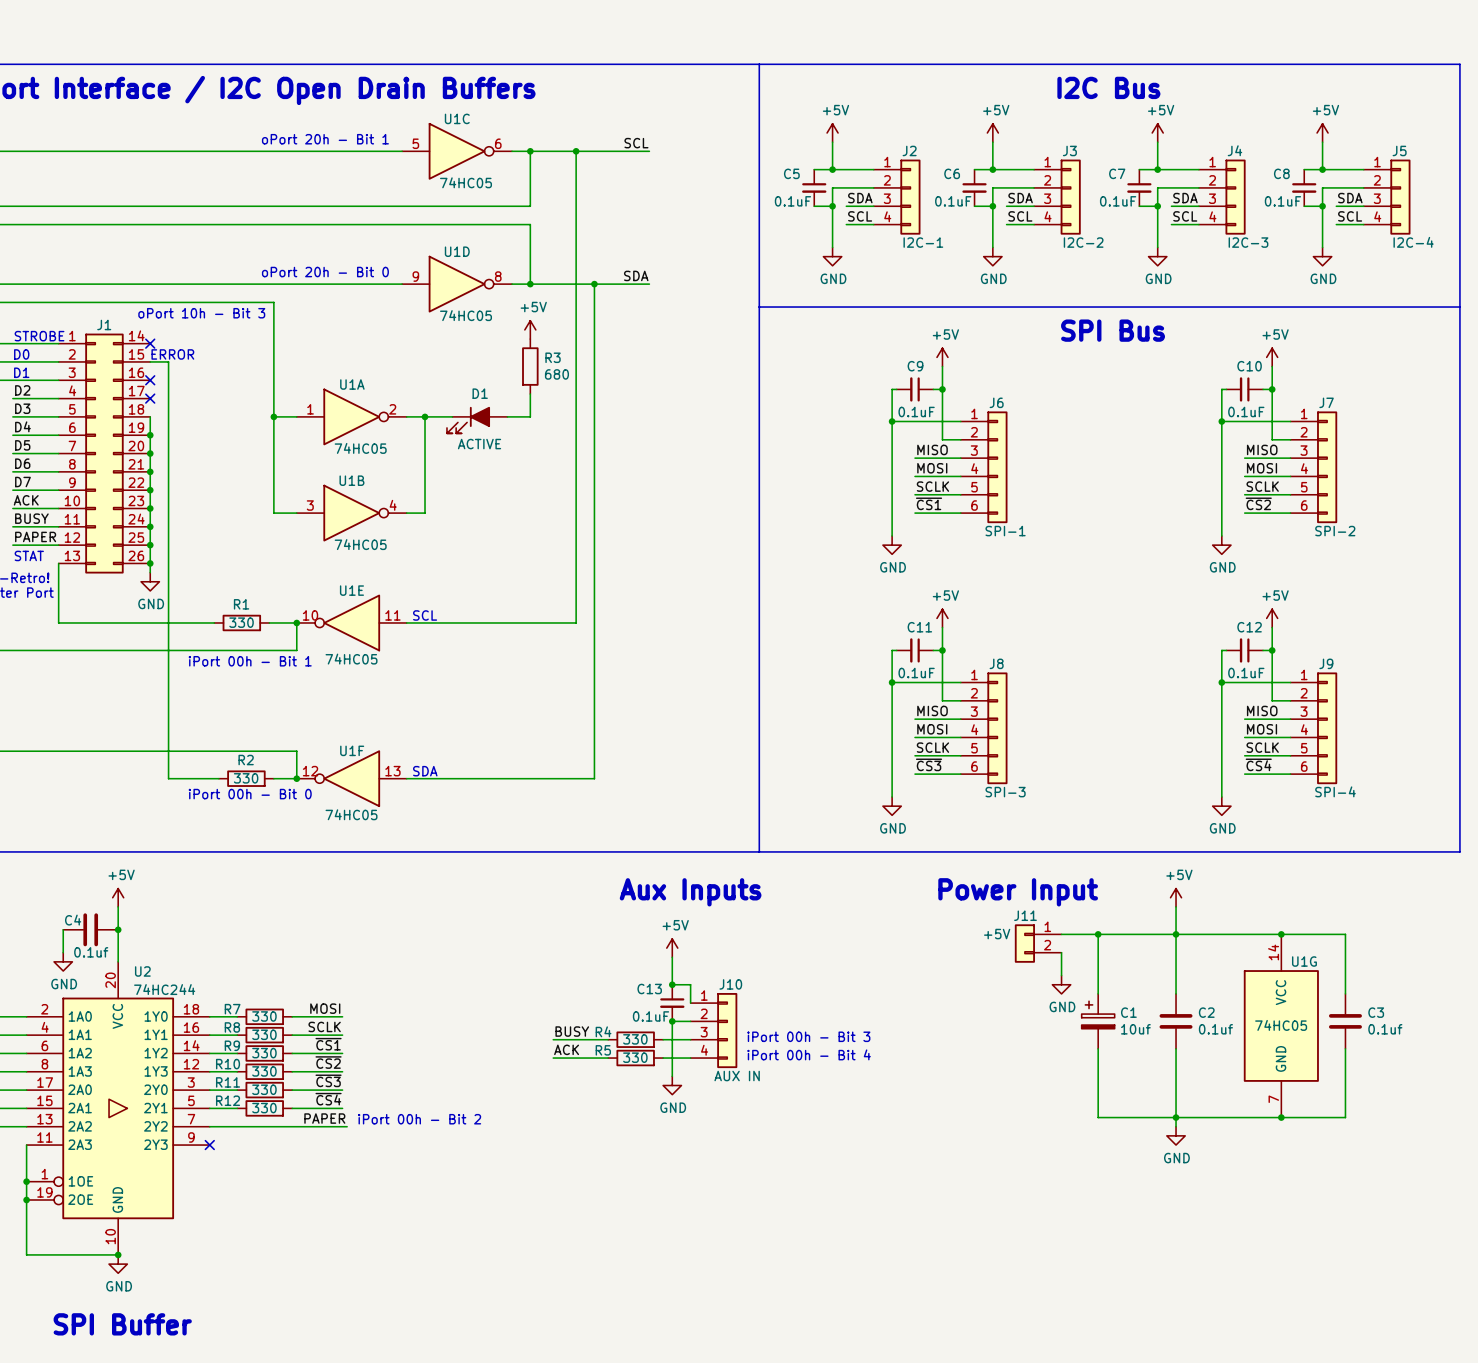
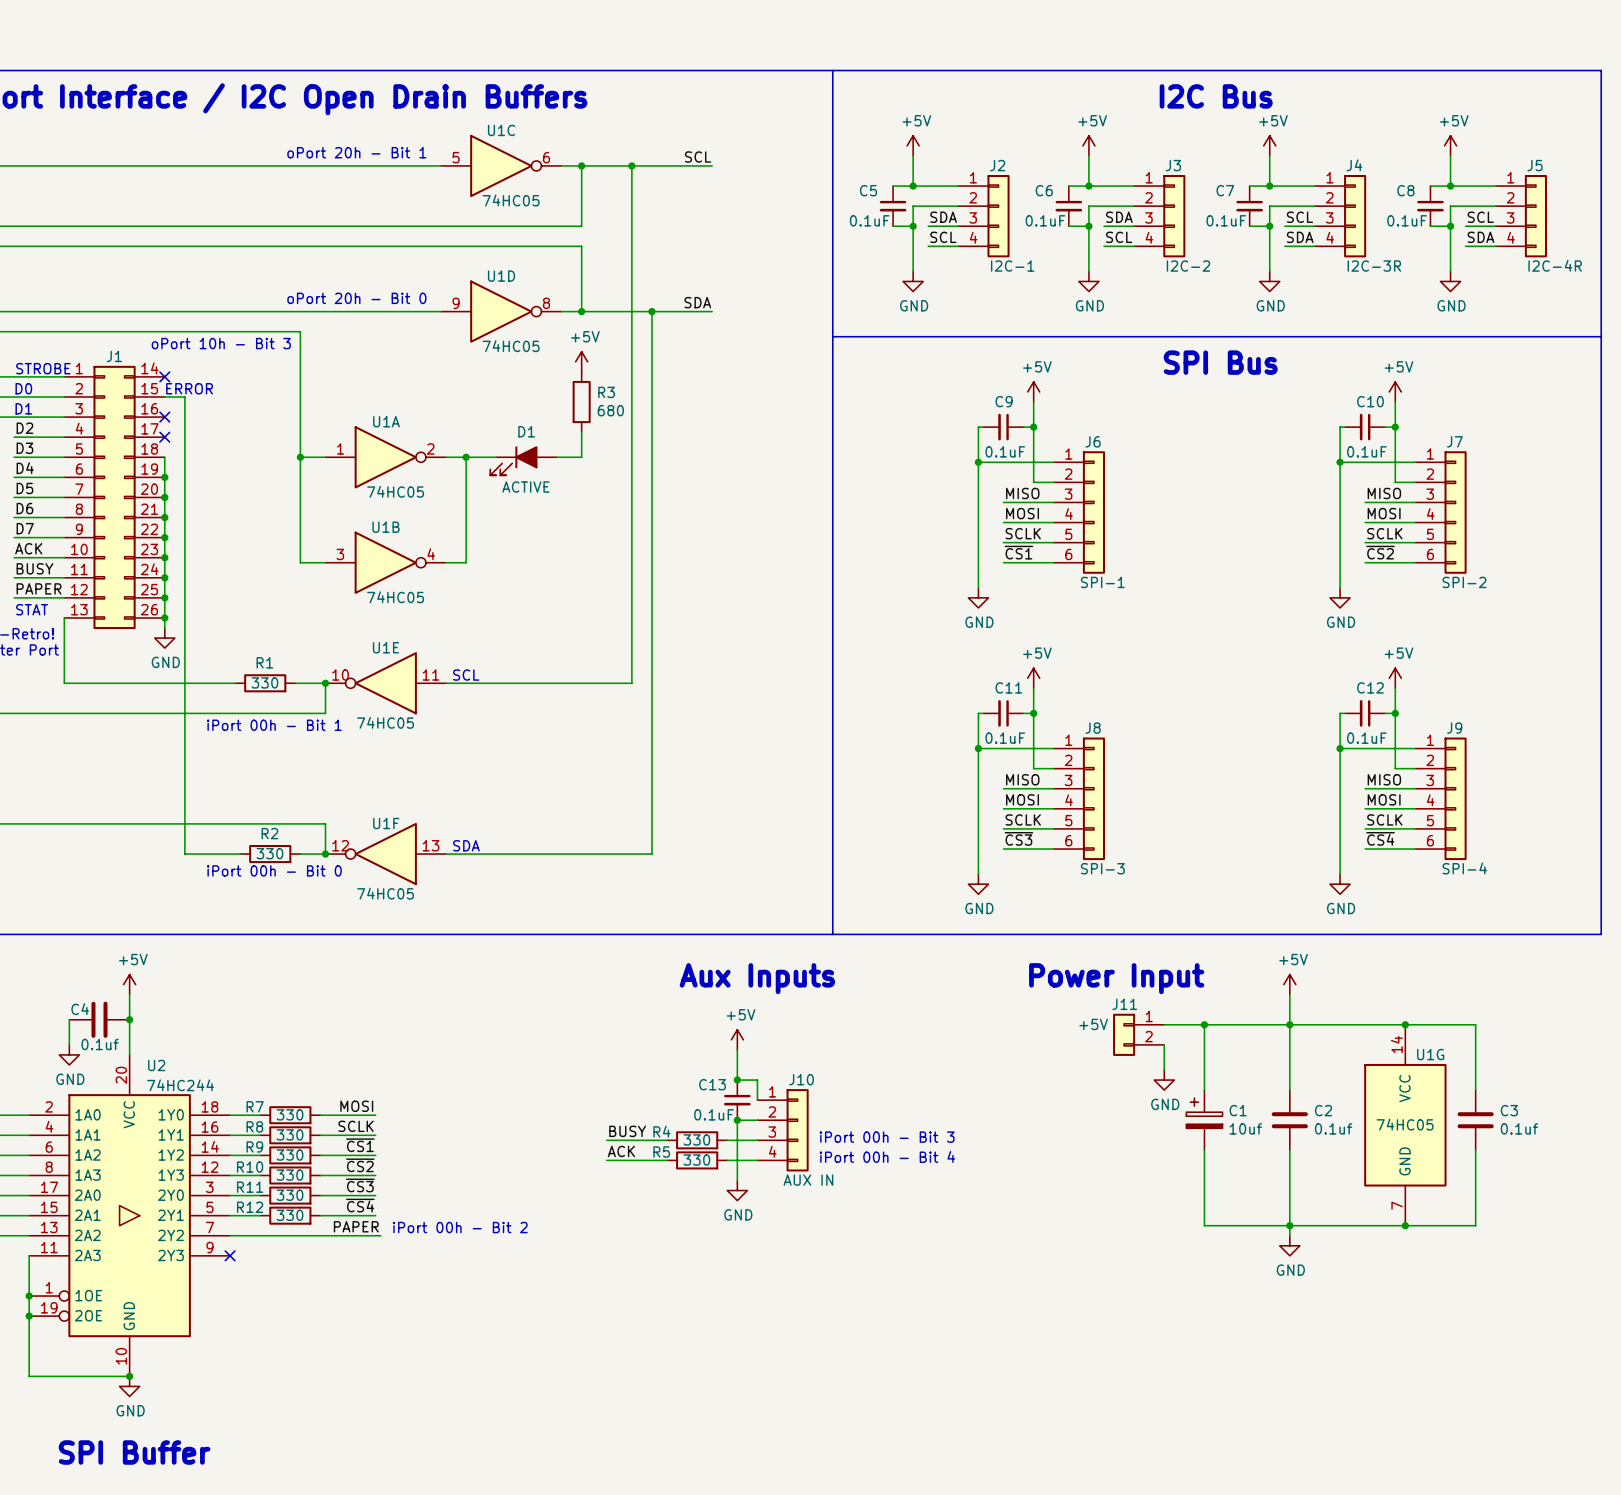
label: SDA (1185, 198) -> SCL (1299, 217)
label: SDA (1350, 198) -> SCL (1480, 217)
label: SCL (1185, 216) -> SDA (1300, 237)
label: SCL (1350, 216) -> SDA (1480, 237)
J4 value: I2C-3 (1248, 242) -> I2C-3R (1374, 266)
J5 value: I2C-4 (1413, 242) -> I2C-4R (1555, 265)

